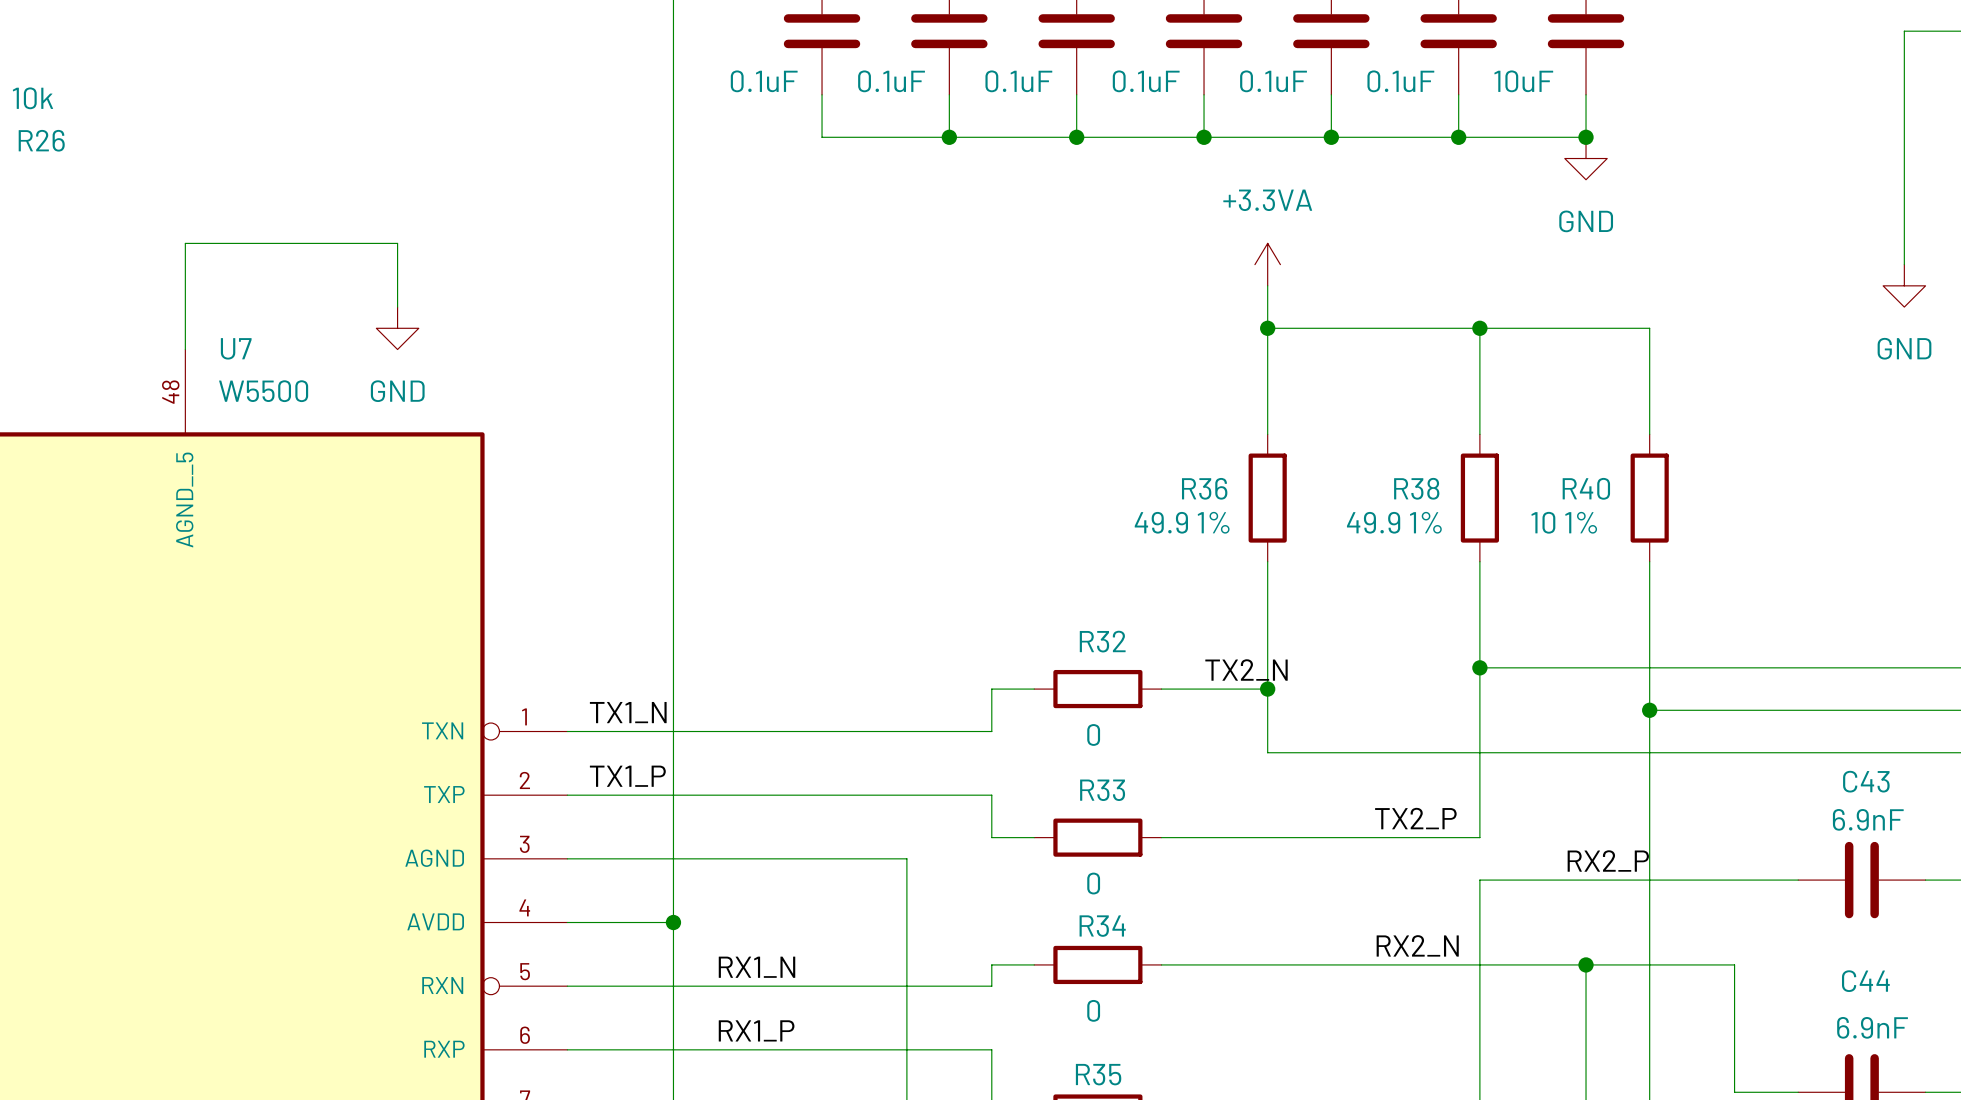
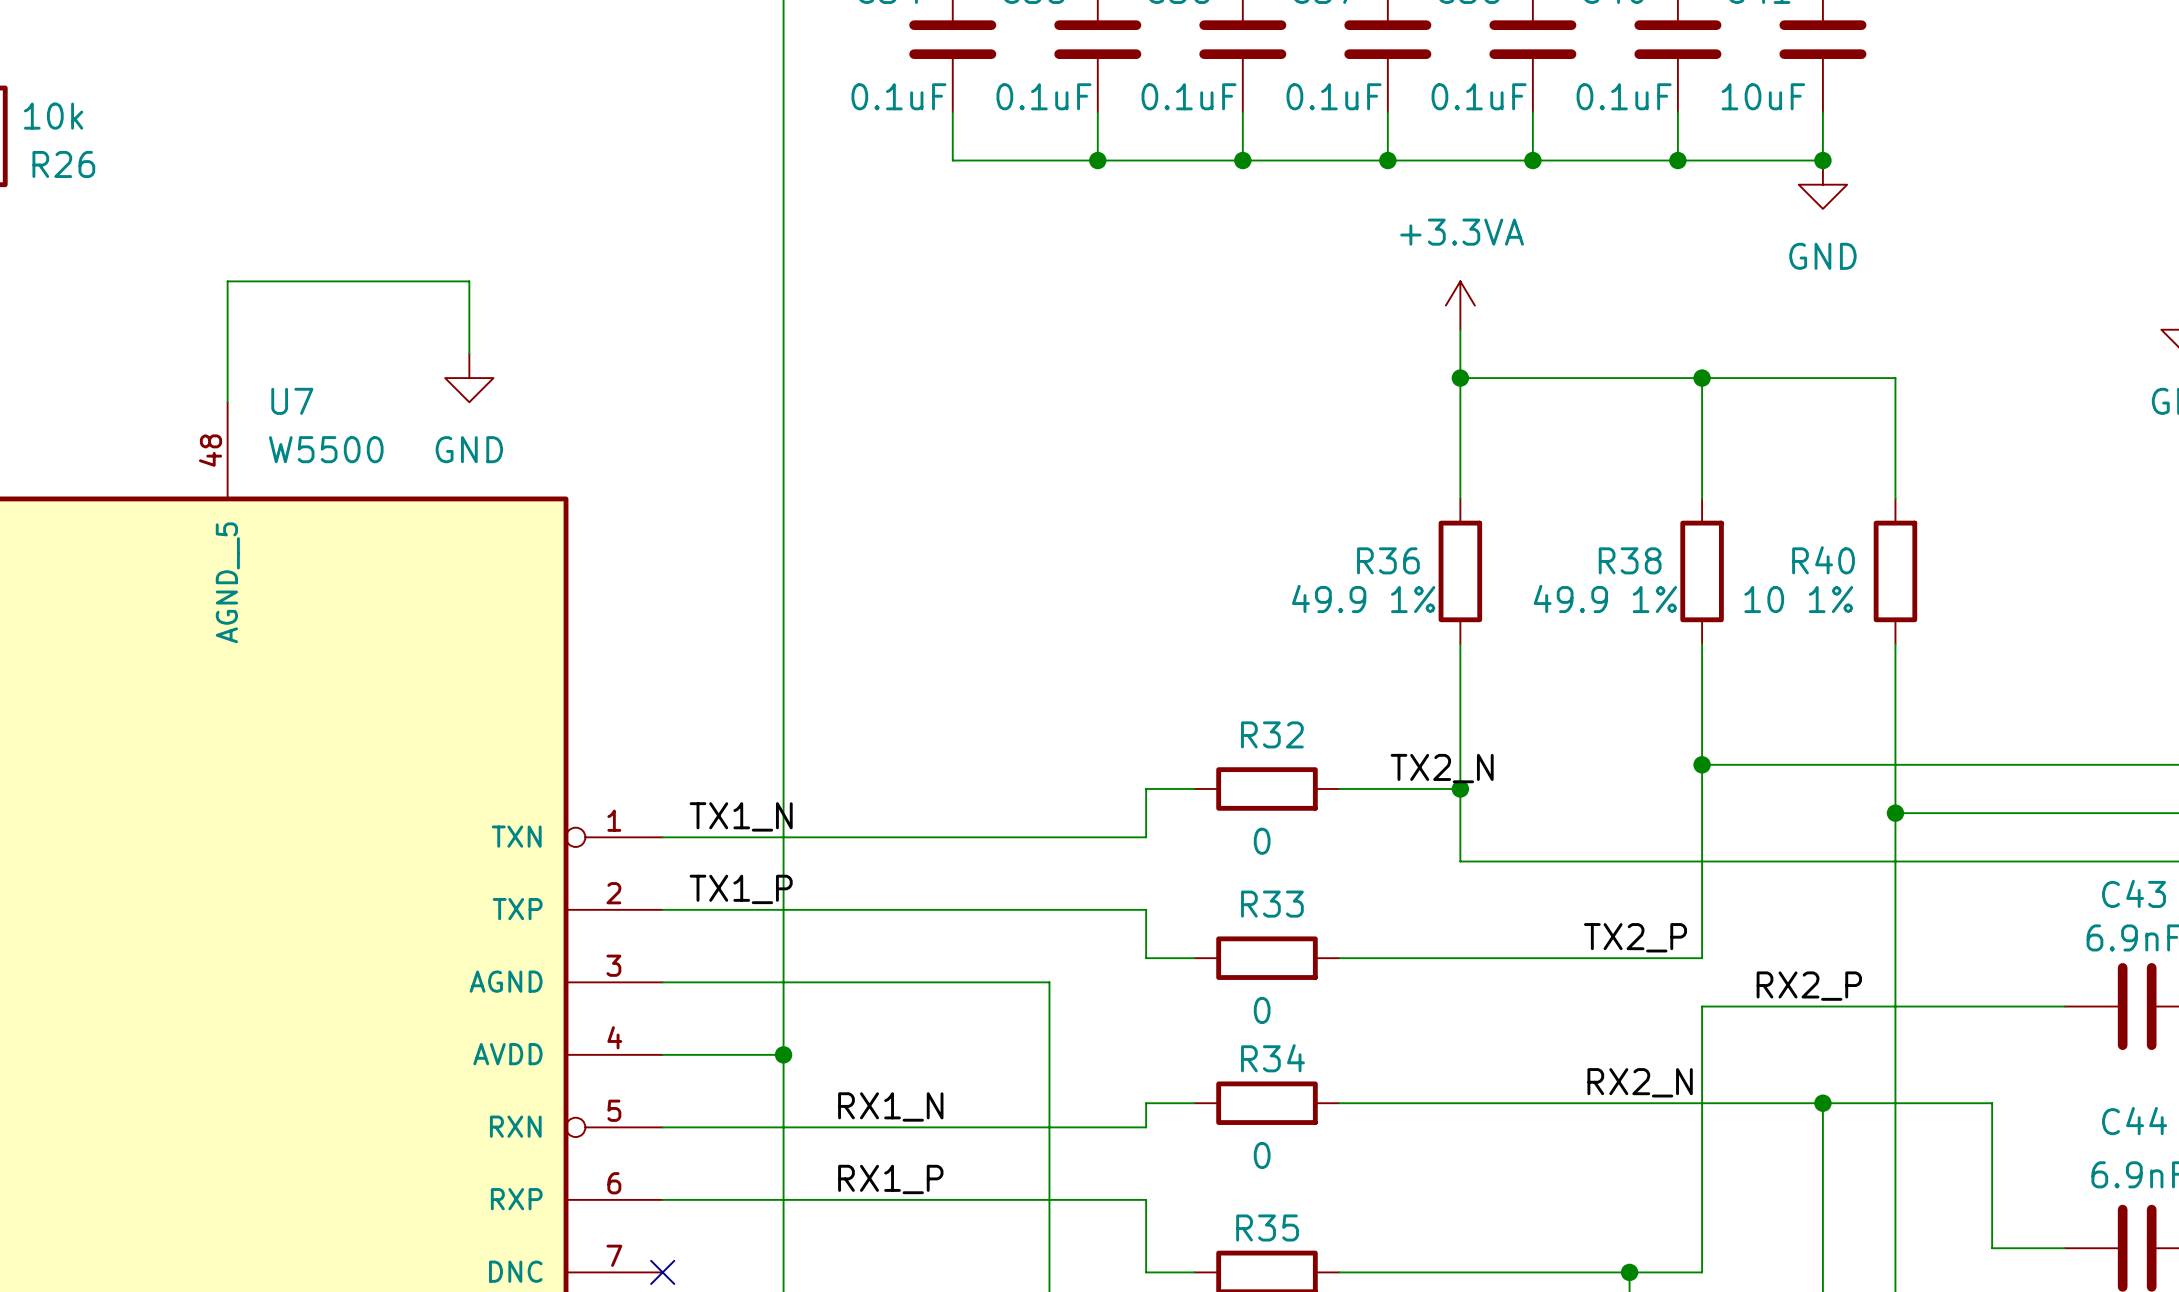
label position: RX2_P (1608, 861) -> RX2_P (1809, 986)

